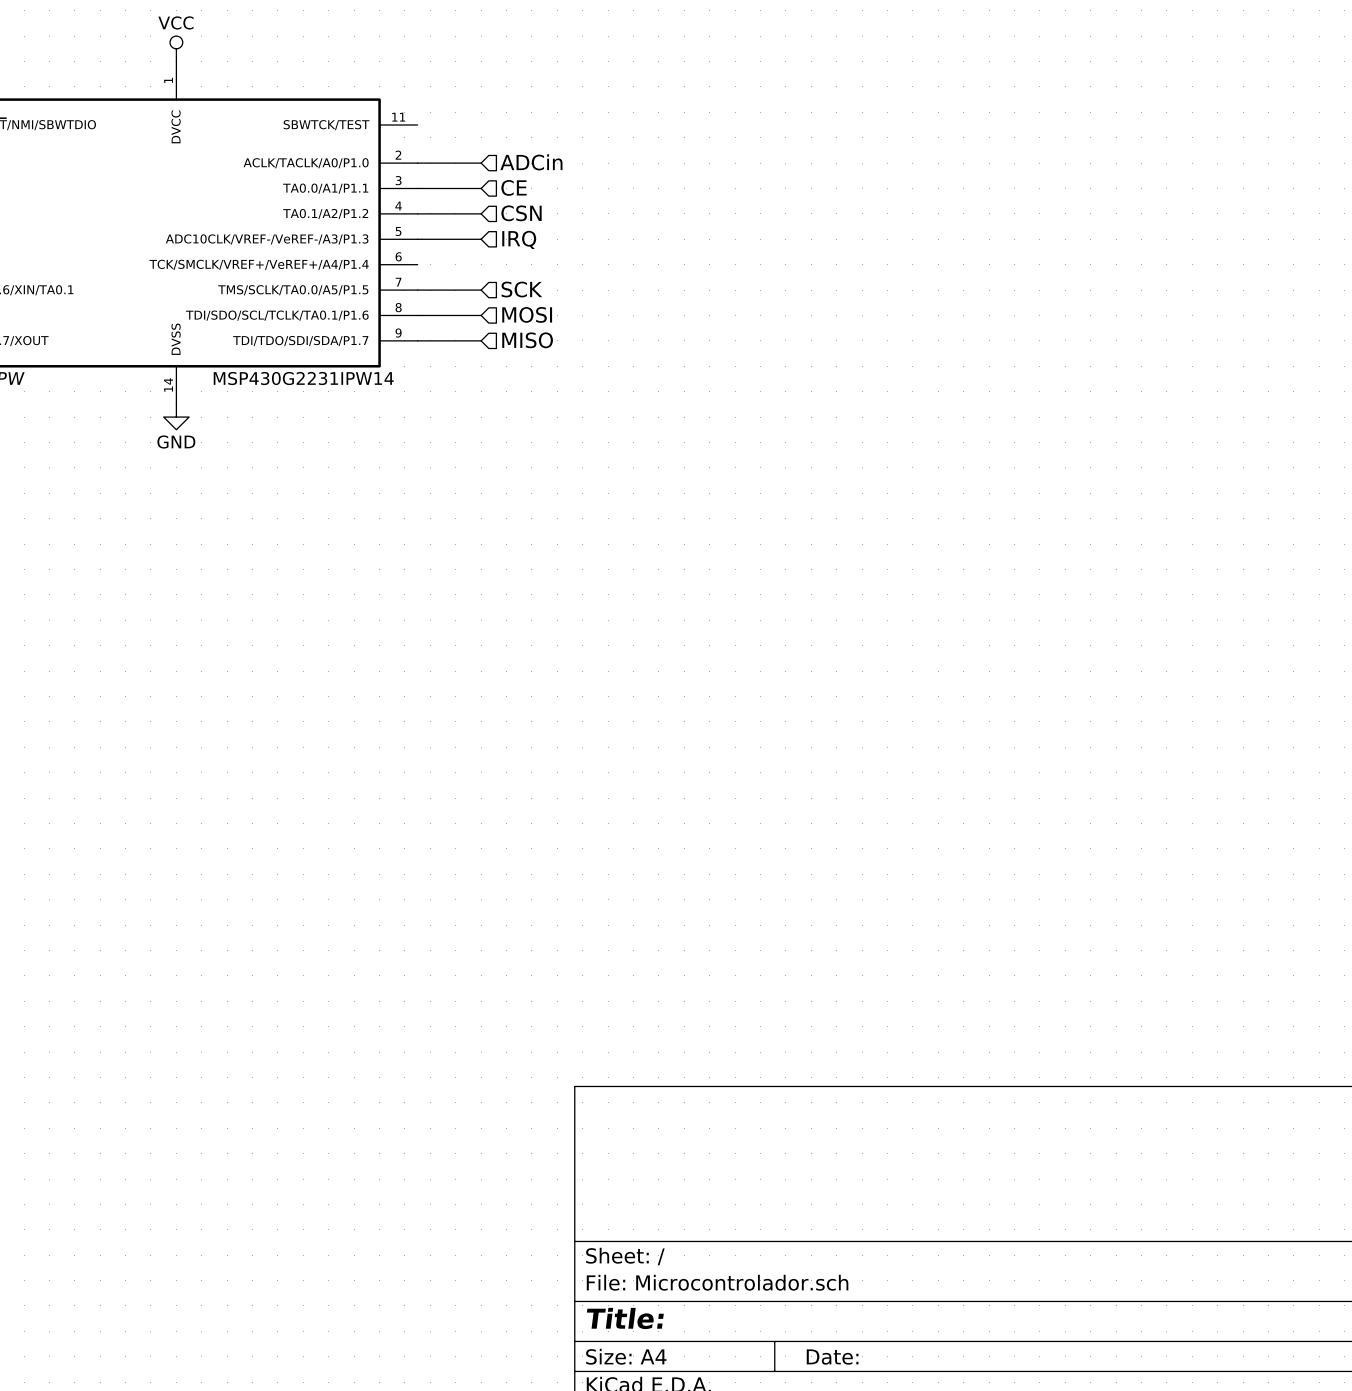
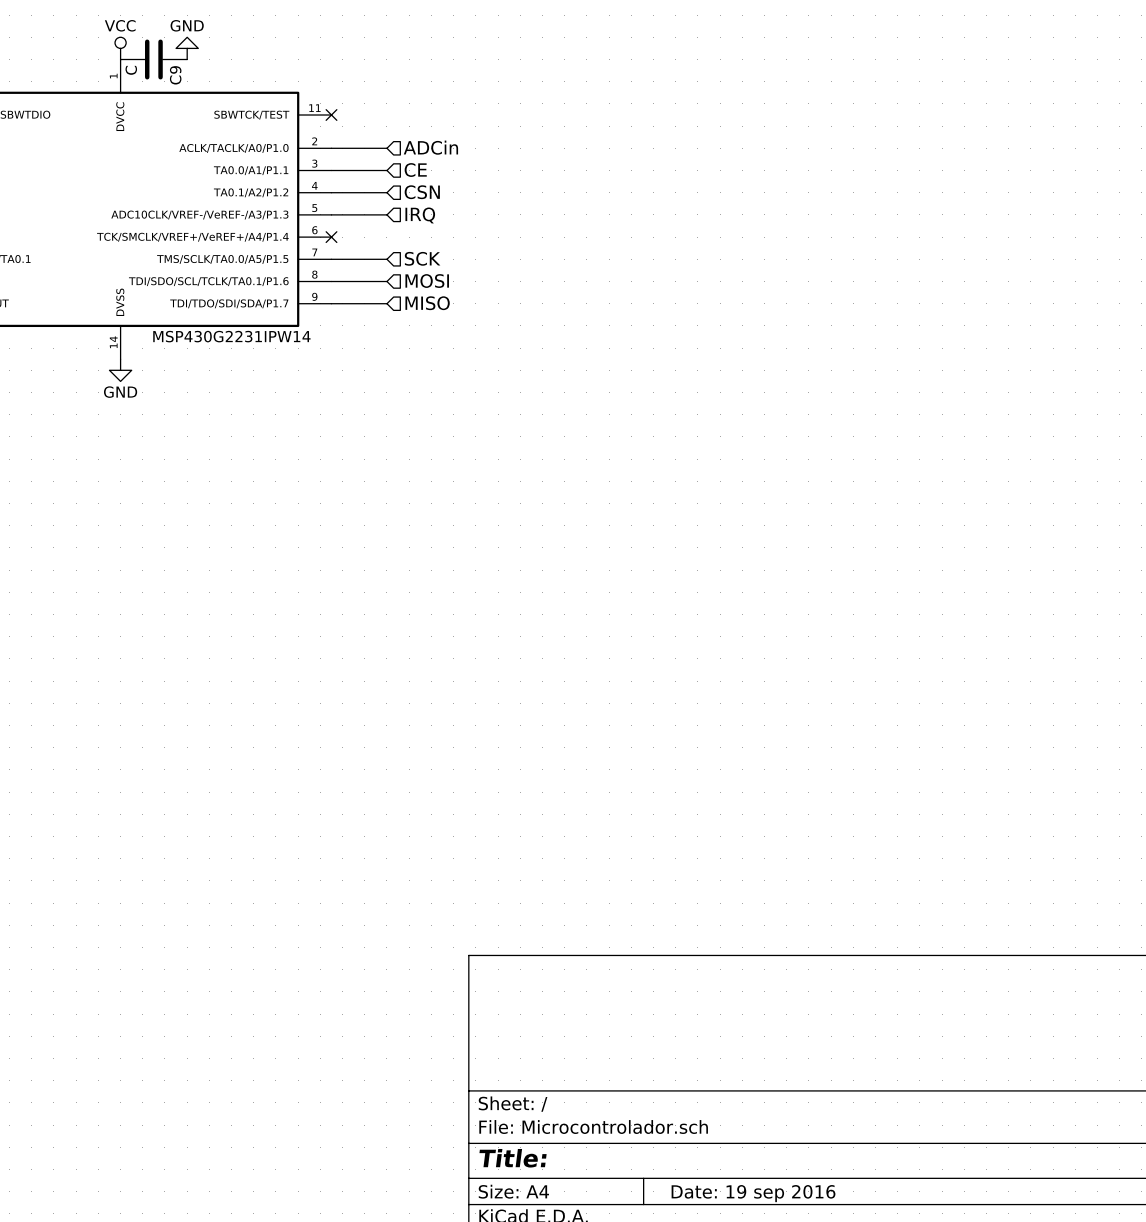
power symbol: none -> GND (187, 48)
C9: none -> C (153, 59)
no-connect mark: none -> (331, 115)
no-connect mark: none -> (331, 237)
title block: Date: (832, 1357) -> Date: 19 sep 2016 (753, 1193)

